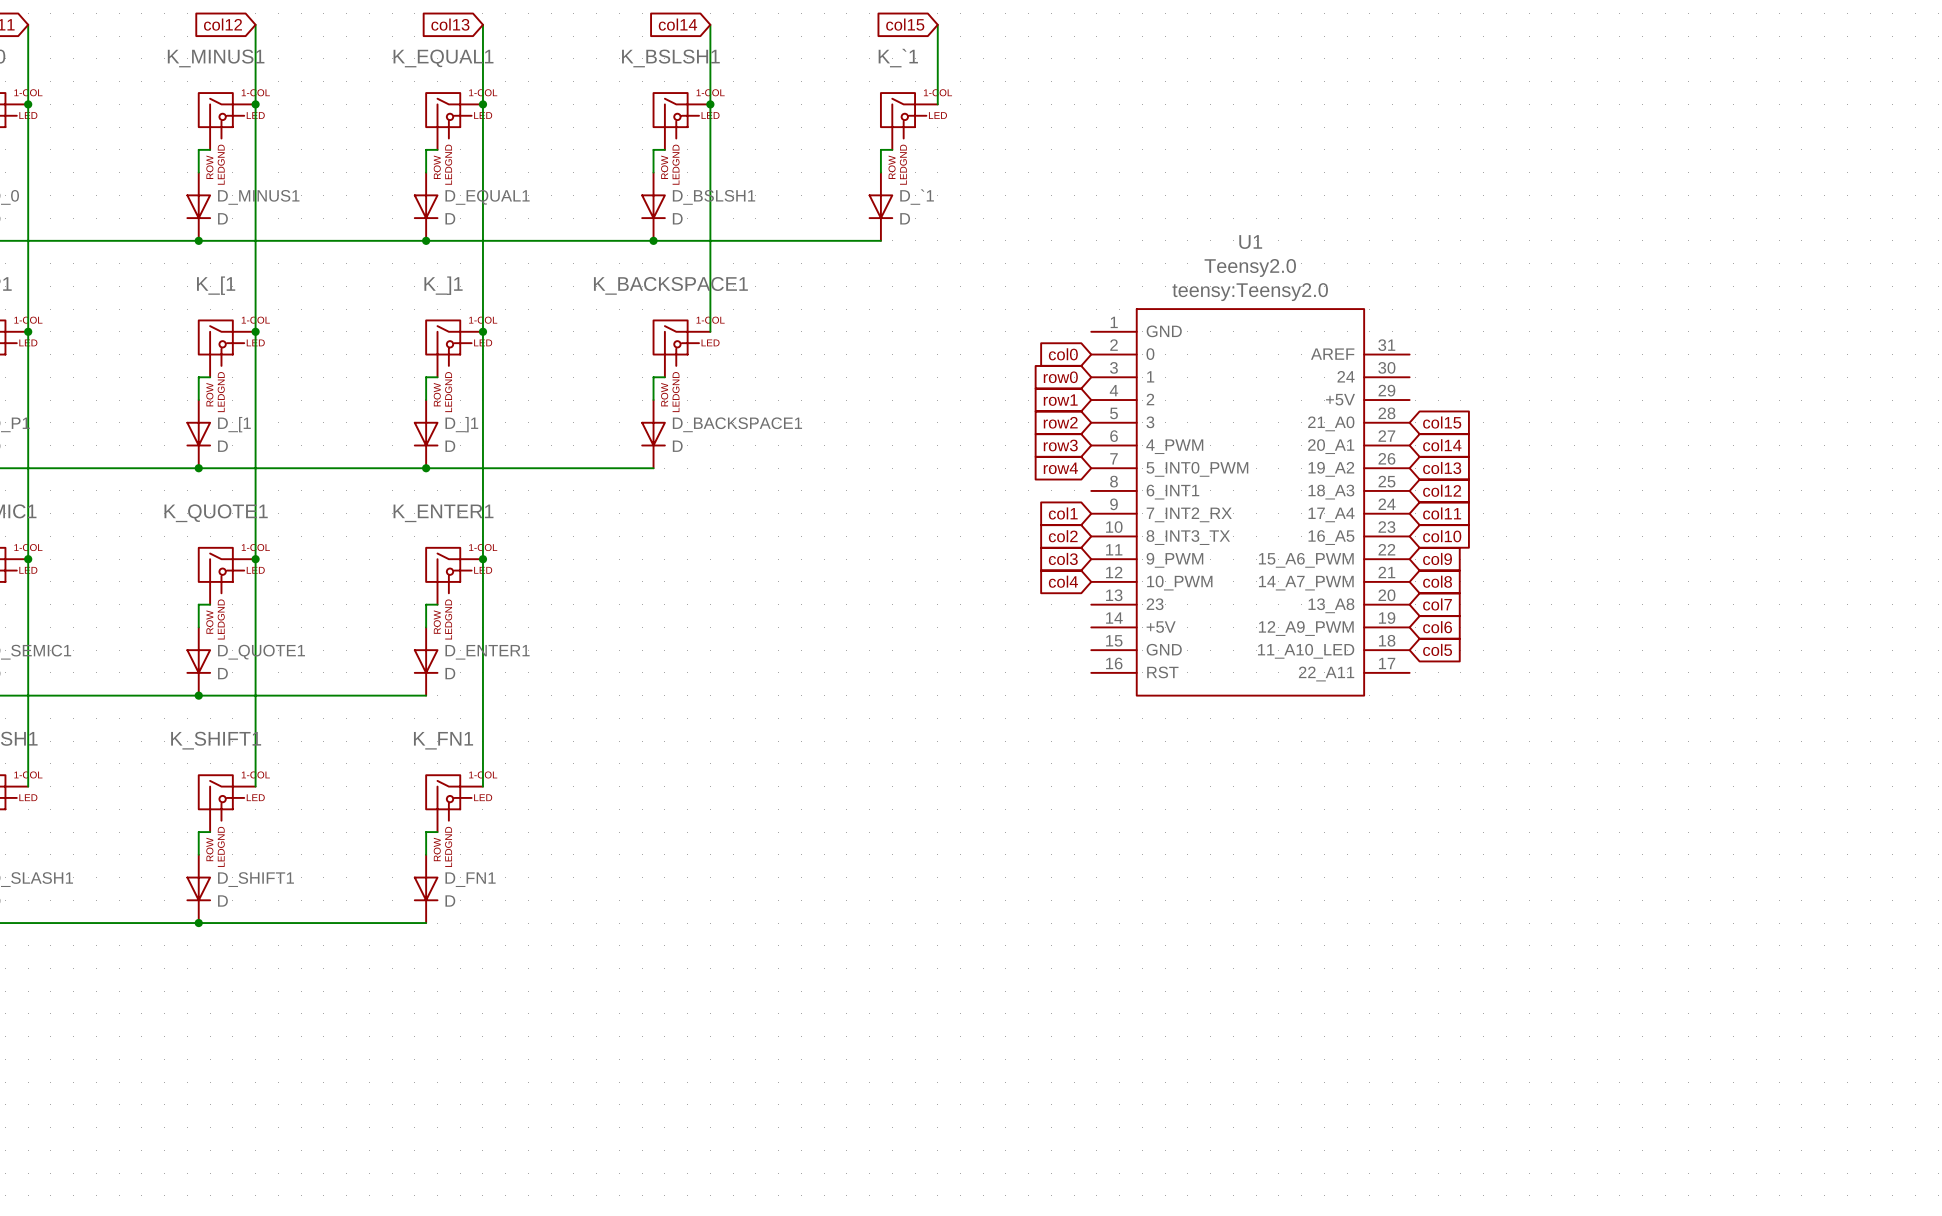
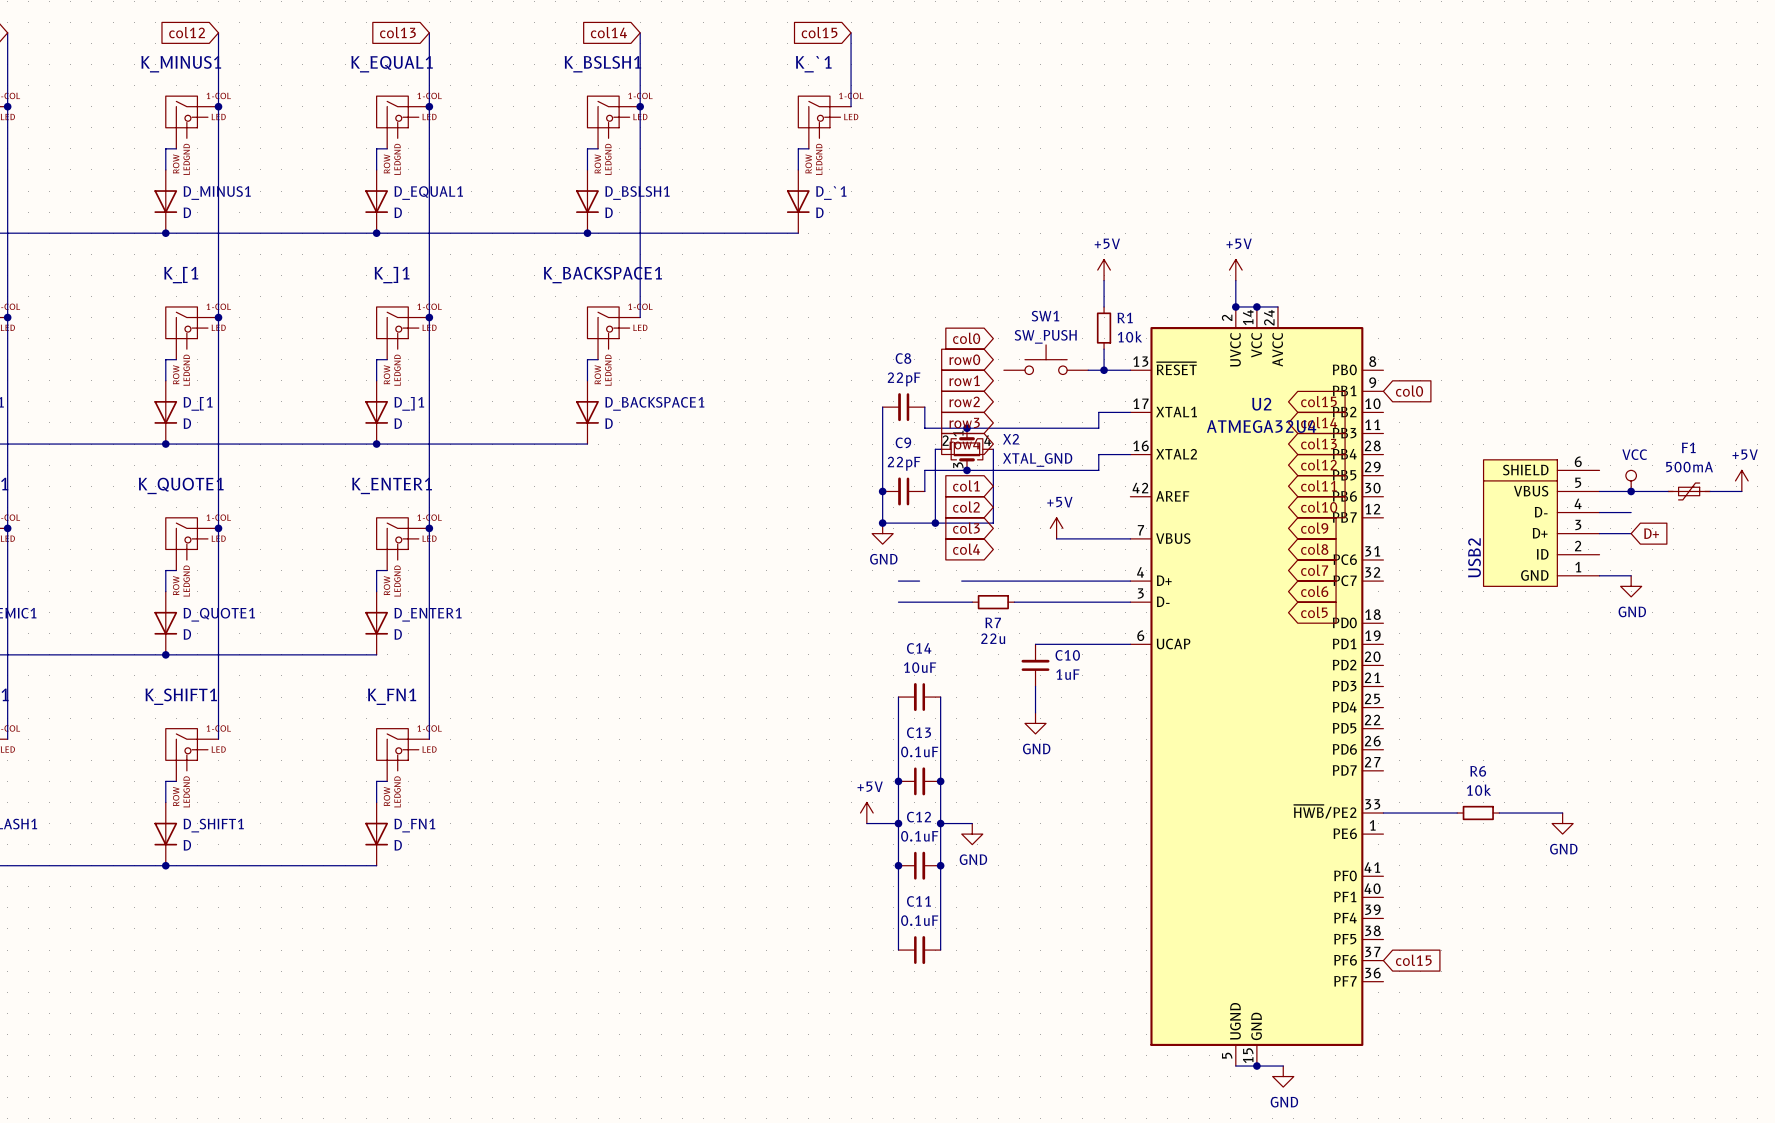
power symbol: none -> +5V (1104, 270)
power symbol: none -> +5V (1235, 270)
wire: none -> (1104, 280) (1104, 306)
wire: none -> (1235, 280) (1235, 306) (1277, 306)
junction: none -> (1235, 306)
junction: none -> (1256, 306)
R1: none -> 10k (1104, 328)
wire: none -> (1104, 349) (1104, 370)
SW1: none -> SW_PUSH (1046, 359)
wire: none -> (1088, 370) (1130, 370)
junction: none -> (1104, 370)
global label: none -> col0 (1409, 391)
wire: none -> (882, 407) (882, 523) (993, 523) (993, 449)
C8: none -> 22pF (903, 407)
wire: none -> (924, 407) (924, 428) (1098, 428) (1098, 412) (1130, 412)
junction: none -> (966, 428)
wire: none -> (940, 449) (935, 449) (935, 523)
X2: none -> XTAL_GND (966, 449)
wire: none -> (1130, 454) (1098, 454) (1098, 470) (924, 470) (924, 491)
junction: none -> (966, 470)
U1: Teensy2.0 (1250, 502) -> none
power symbol: none -> VCC (1631, 480)
power symbol: none -> +5V (1741, 480)
junction: none -> (882, 491)
C9: none -> 22pF (903, 491)
wire: none -> (1599, 491) (1668, 491)
junction: none -> (1631, 491)
F1: none -> 500mA (1689, 491)
wire: none -> (1710, 491) (1741, 491)
wire: none -> (1599, 512) (1631, 512)
junction: none -> (882, 523)
junction: none -> (935, 523)
USB2: none -> (1541, 523)
power symbol: none -> +5V (1056, 528)
power symbol: none -> GND (882, 533)
wire: none -> (1599, 533) (1631, 533)
global label: none -> D+ (1651, 533)
wire: none -> (1056, 538) (1130, 538)
wire: none -> (1599, 575) (1631, 575)
wire: none -> (898, 581) (919, 581)
wire: none -> (961, 581) (1130, 581)
power symbol: none -> GND (1631, 586)
wire: none -> (898, 602) (972, 602)
R7: none -> 22u (993, 602)
wire: none -> (1014, 602) (1130, 602)
wire: none -> (1035, 644) (1130, 644)
C10: none -> 1uF (1035, 665)
wire: none -> (1035, 686) (1035, 712)
U2: none -> ATMEGA32U4 (1256, 686)
wire: none -> (898, 697) (898, 950)
C14: none -> 10uF (919, 697)
wire: none -> (940, 697) (940, 950)
power symbol: none -> GND (1035, 723)
junction: none -> (898, 781)
C13: none -> 0.1uF (919, 781)
junction: none -> (940, 781)
power symbol: none -> +5V (866, 813)
wire: none -> (1383, 813) (1457, 813)
R6: none -> 10k (1478, 813)
wire: none -> (1499, 813) (1562, 813)
wire: none -> (866, 823) (898, 823)
junction: none -> (898, 823)
wire: none -> (940, 823) (972, 823)
junction: none -> (940, 823)
power symbol: none -> GND (1562, 823)
power symbol: none -> GND (972, 834)
junction: none -> (898, 865)
C12: none -> 0.1uF (919, 865)
junction: none -> (940, 865)
C11: none -> 0.1uF (919, 950)
global label: none -> col15 (1413, 960)
wire: none -> (1235, 1066) (1283, 1066)
junction: none -> (1256, 1066)
power symbol: none -> GND (1283, 1076)

